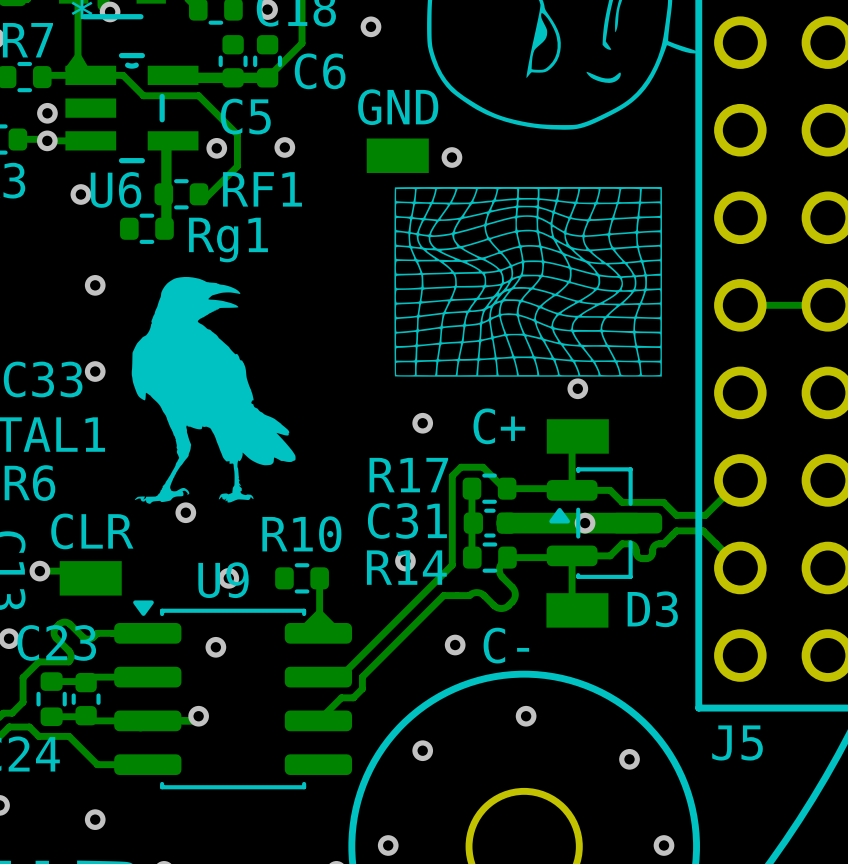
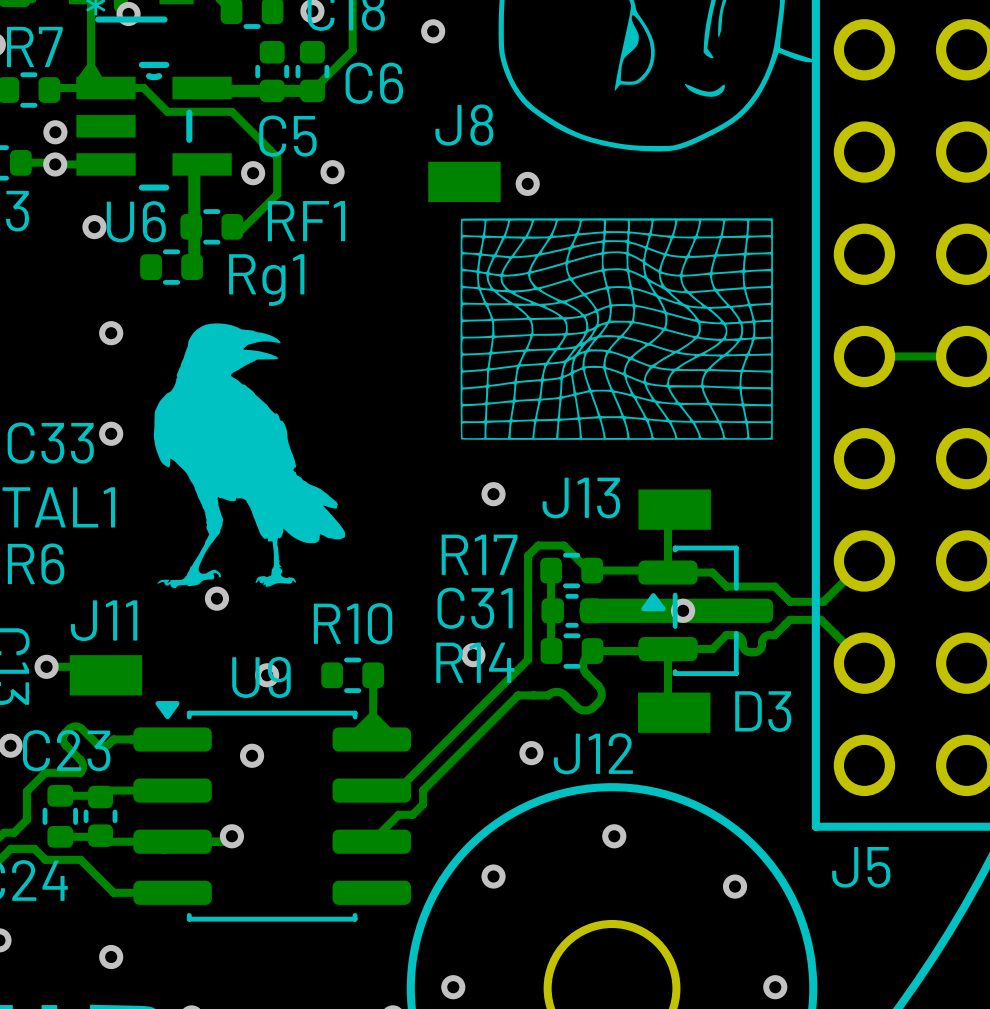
GND name: GND (398, 107) -> J8 (464, 125)
via: (577, 388) -> none
C+ name: C+ (499, 426) -> J13 (581, 497)
CLR name: CLR (92, 531) -> J11 (104, 620)
C- name: C- (506, 645) -> J12 (593, 753)

